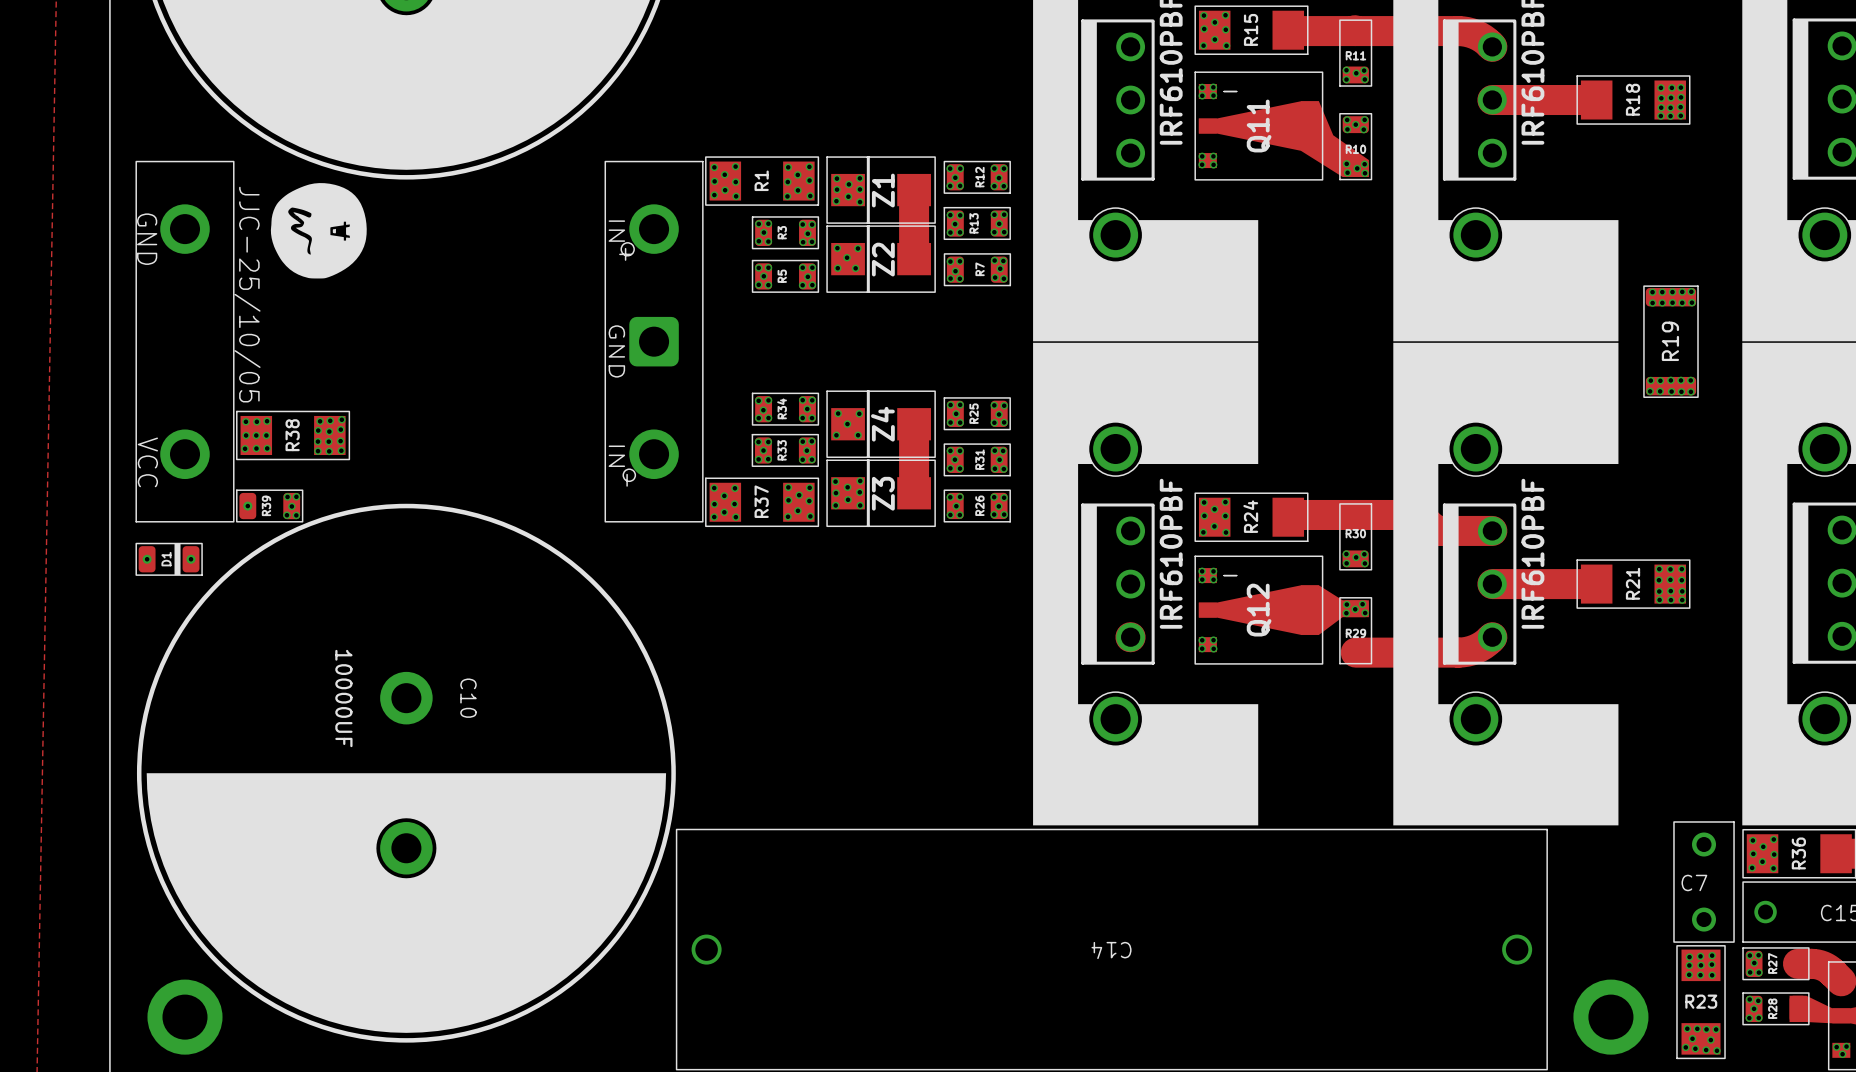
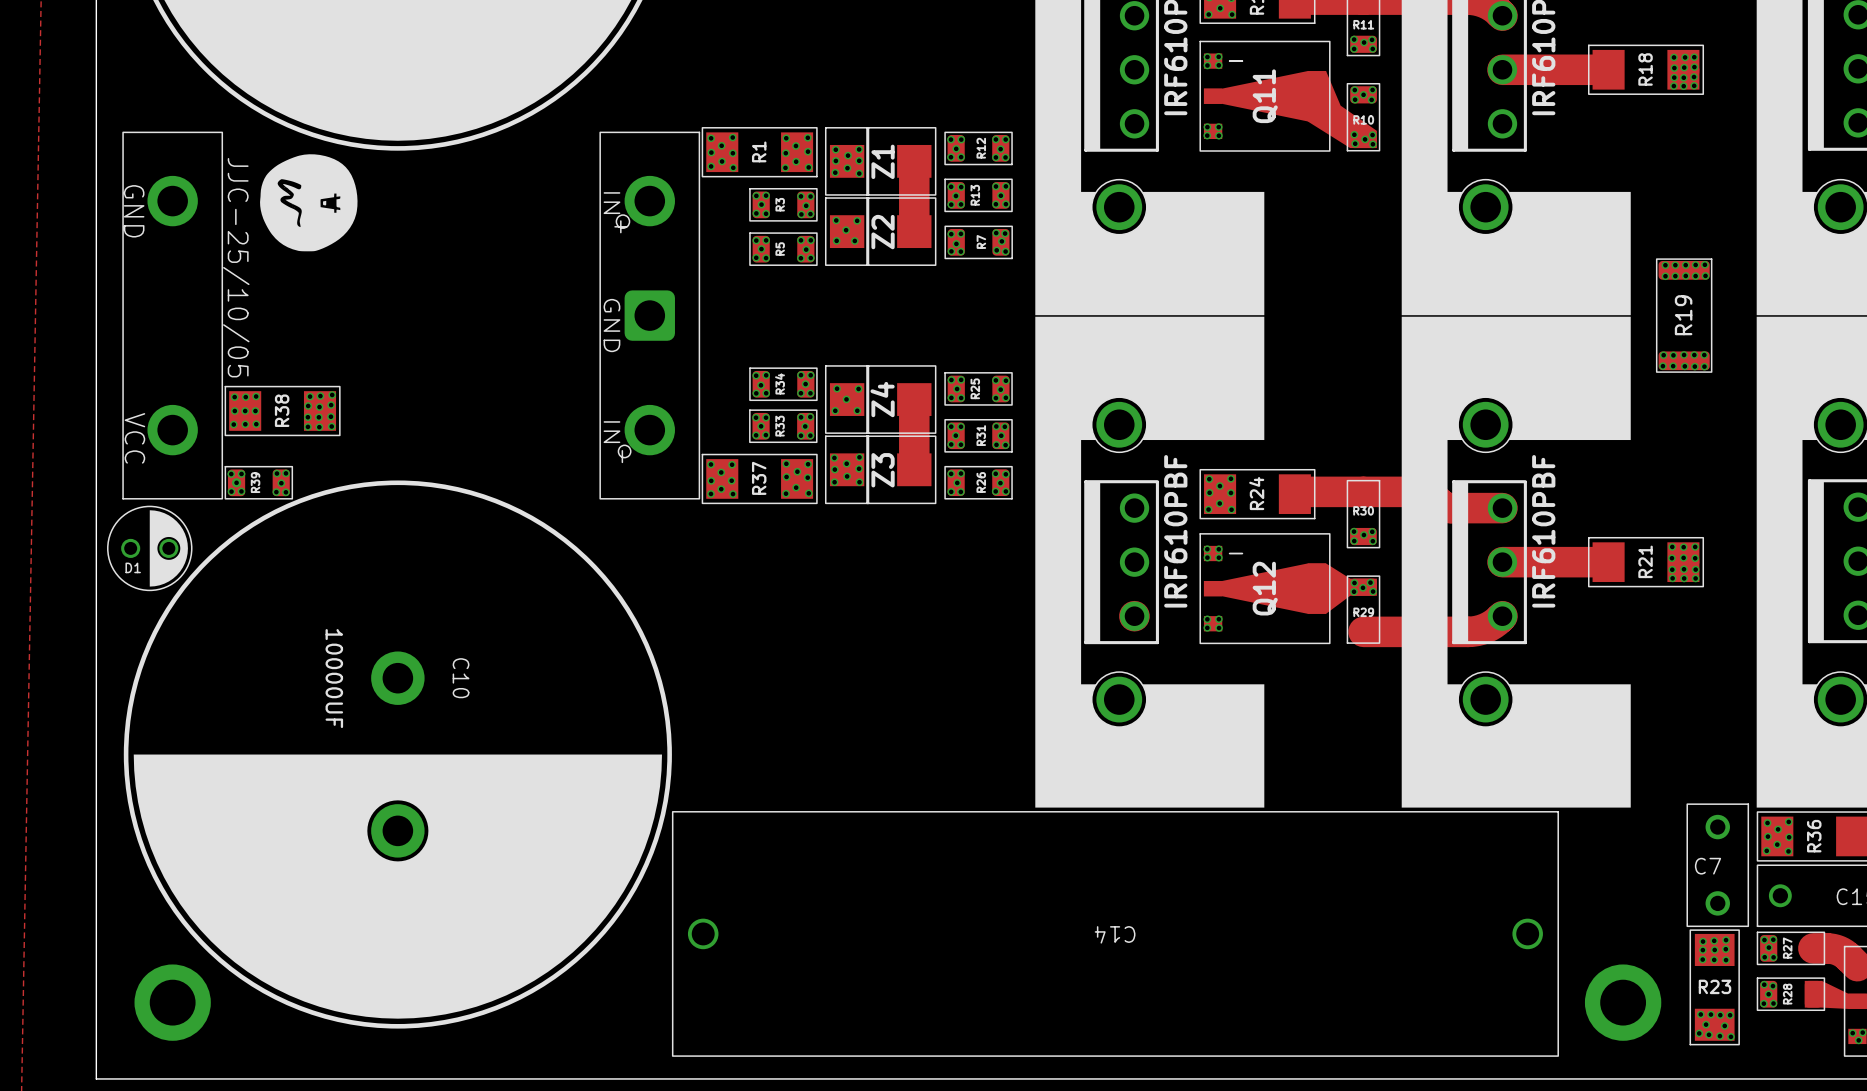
via: none -> (231, 474)
via: none -> (241, 473)
via: none -> (231, 491)
via: none -> (241, 491)
D1 footprint: [135, 542, 203, 576] -> [107, 505, 193, 592]
via: (147, 559) -> none
via: (191, 559) -> none

